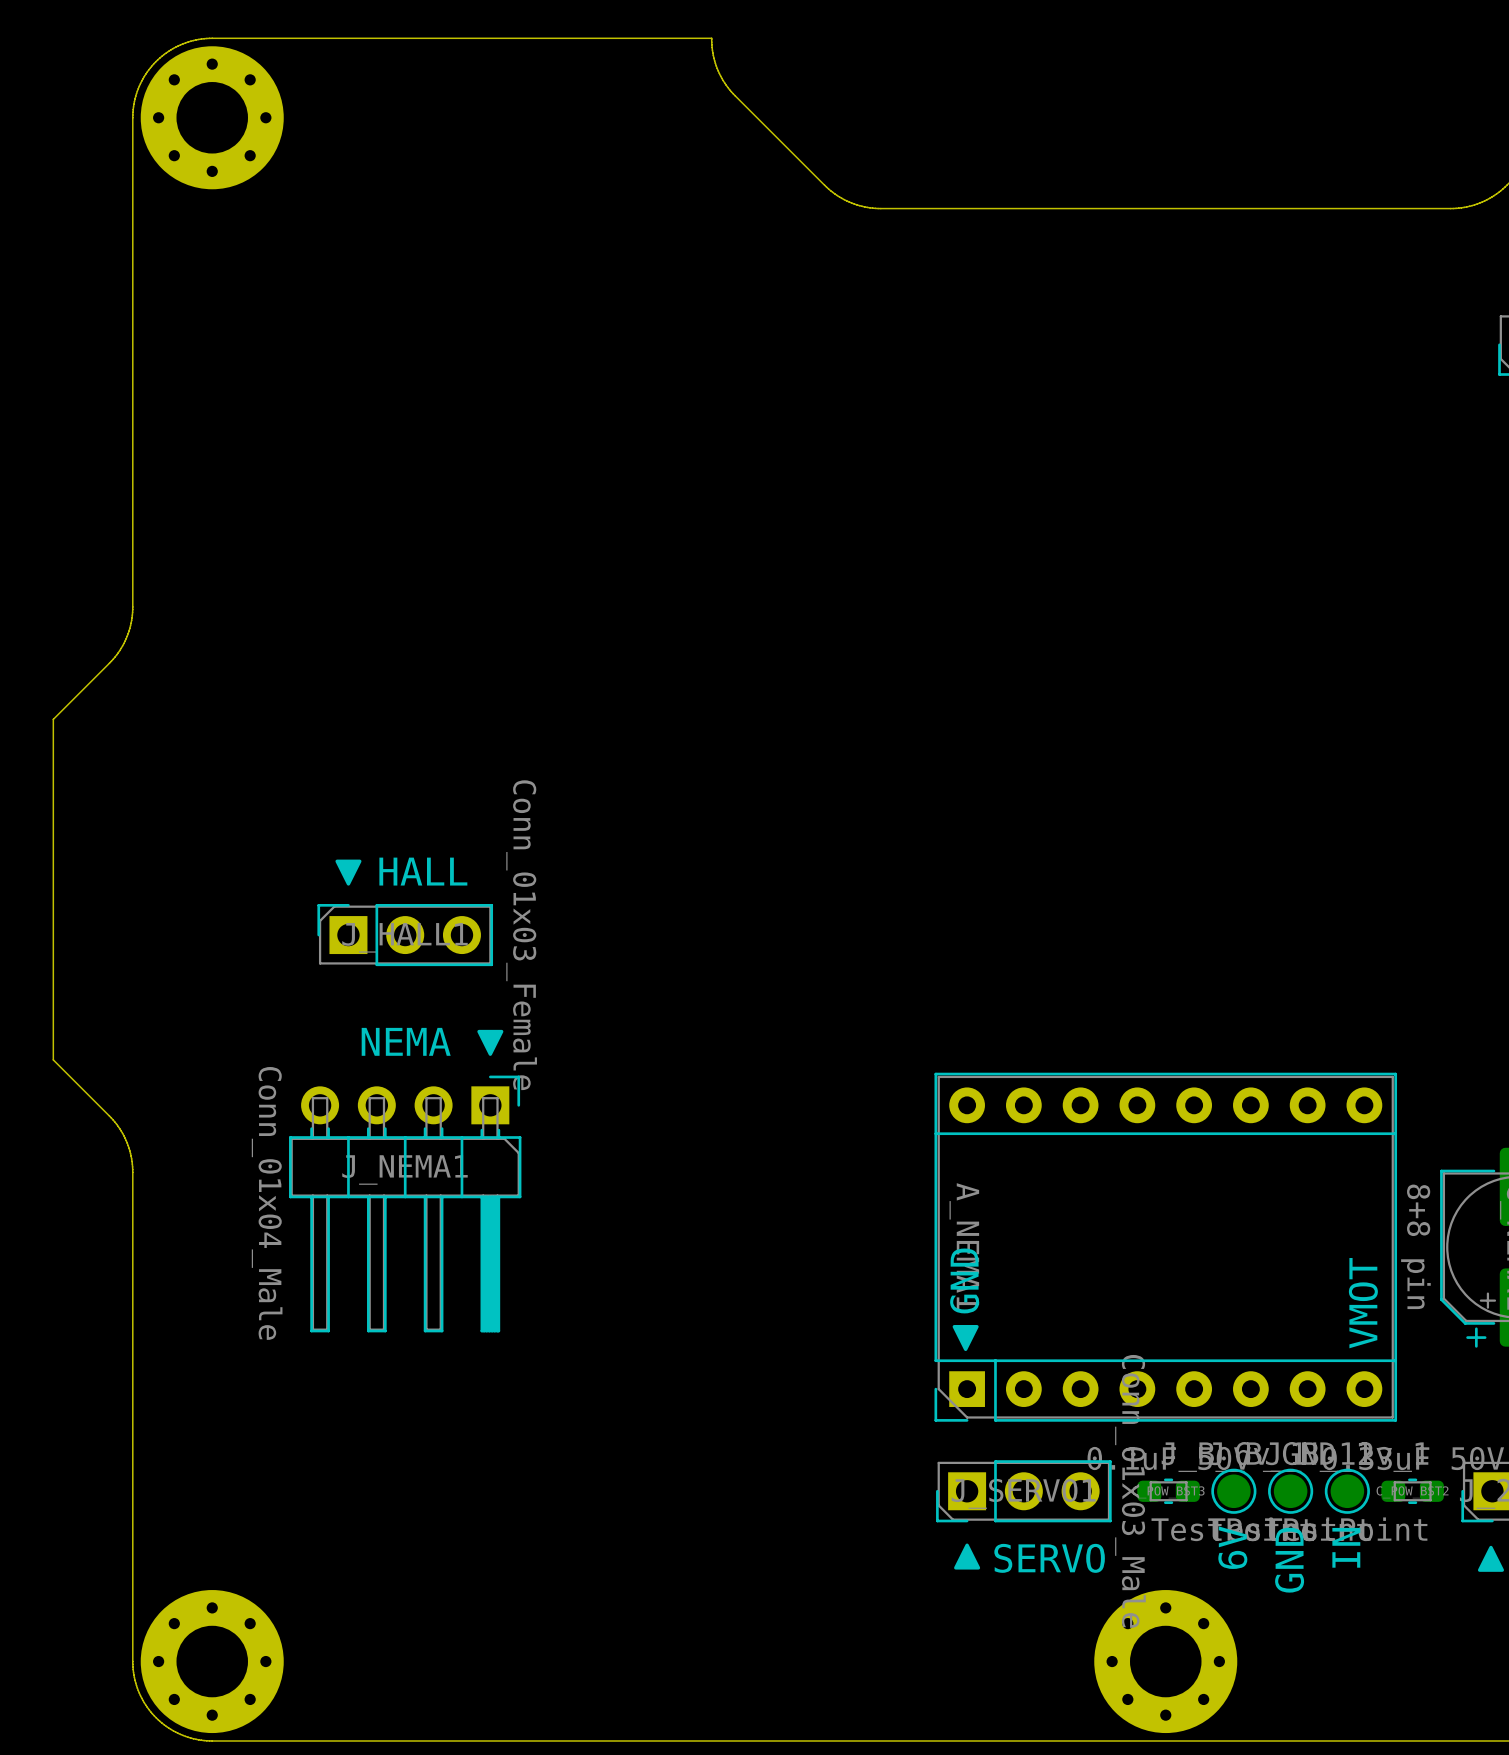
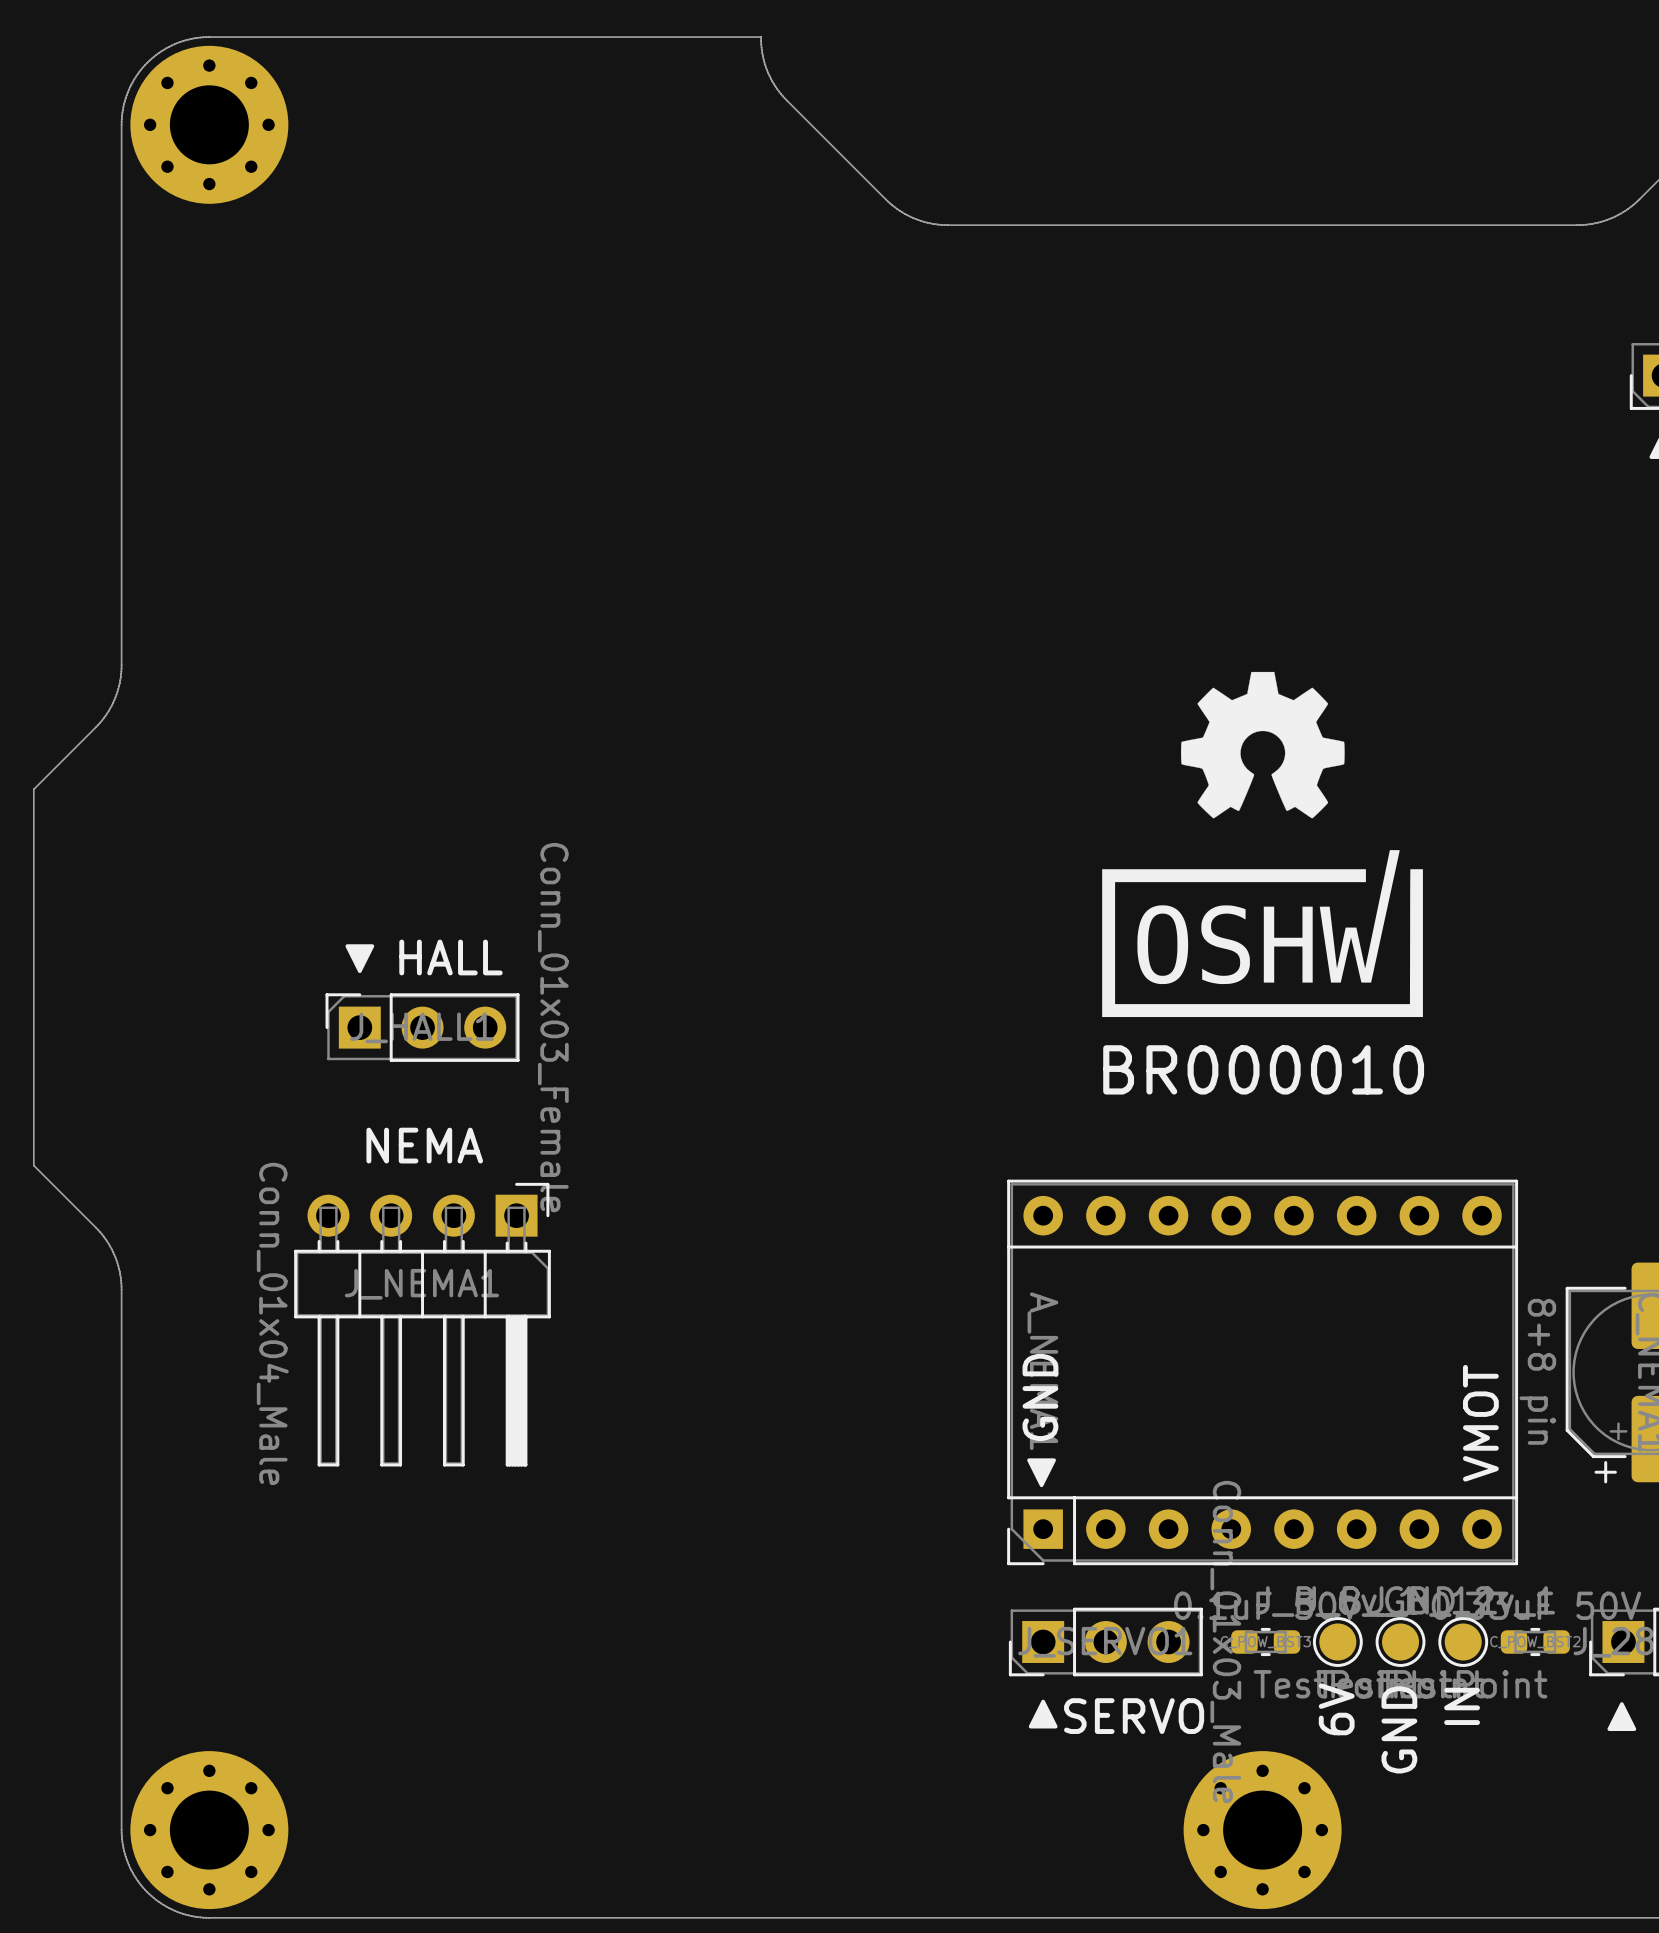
drawing: none -> [1180, 671, 1345, 819]
drawing: none -> [1102, 850, 1423, 1018]
text: none -> BR000010 (1263, 1069)
drawing: [477, 1029, 504, 1056] -> none

